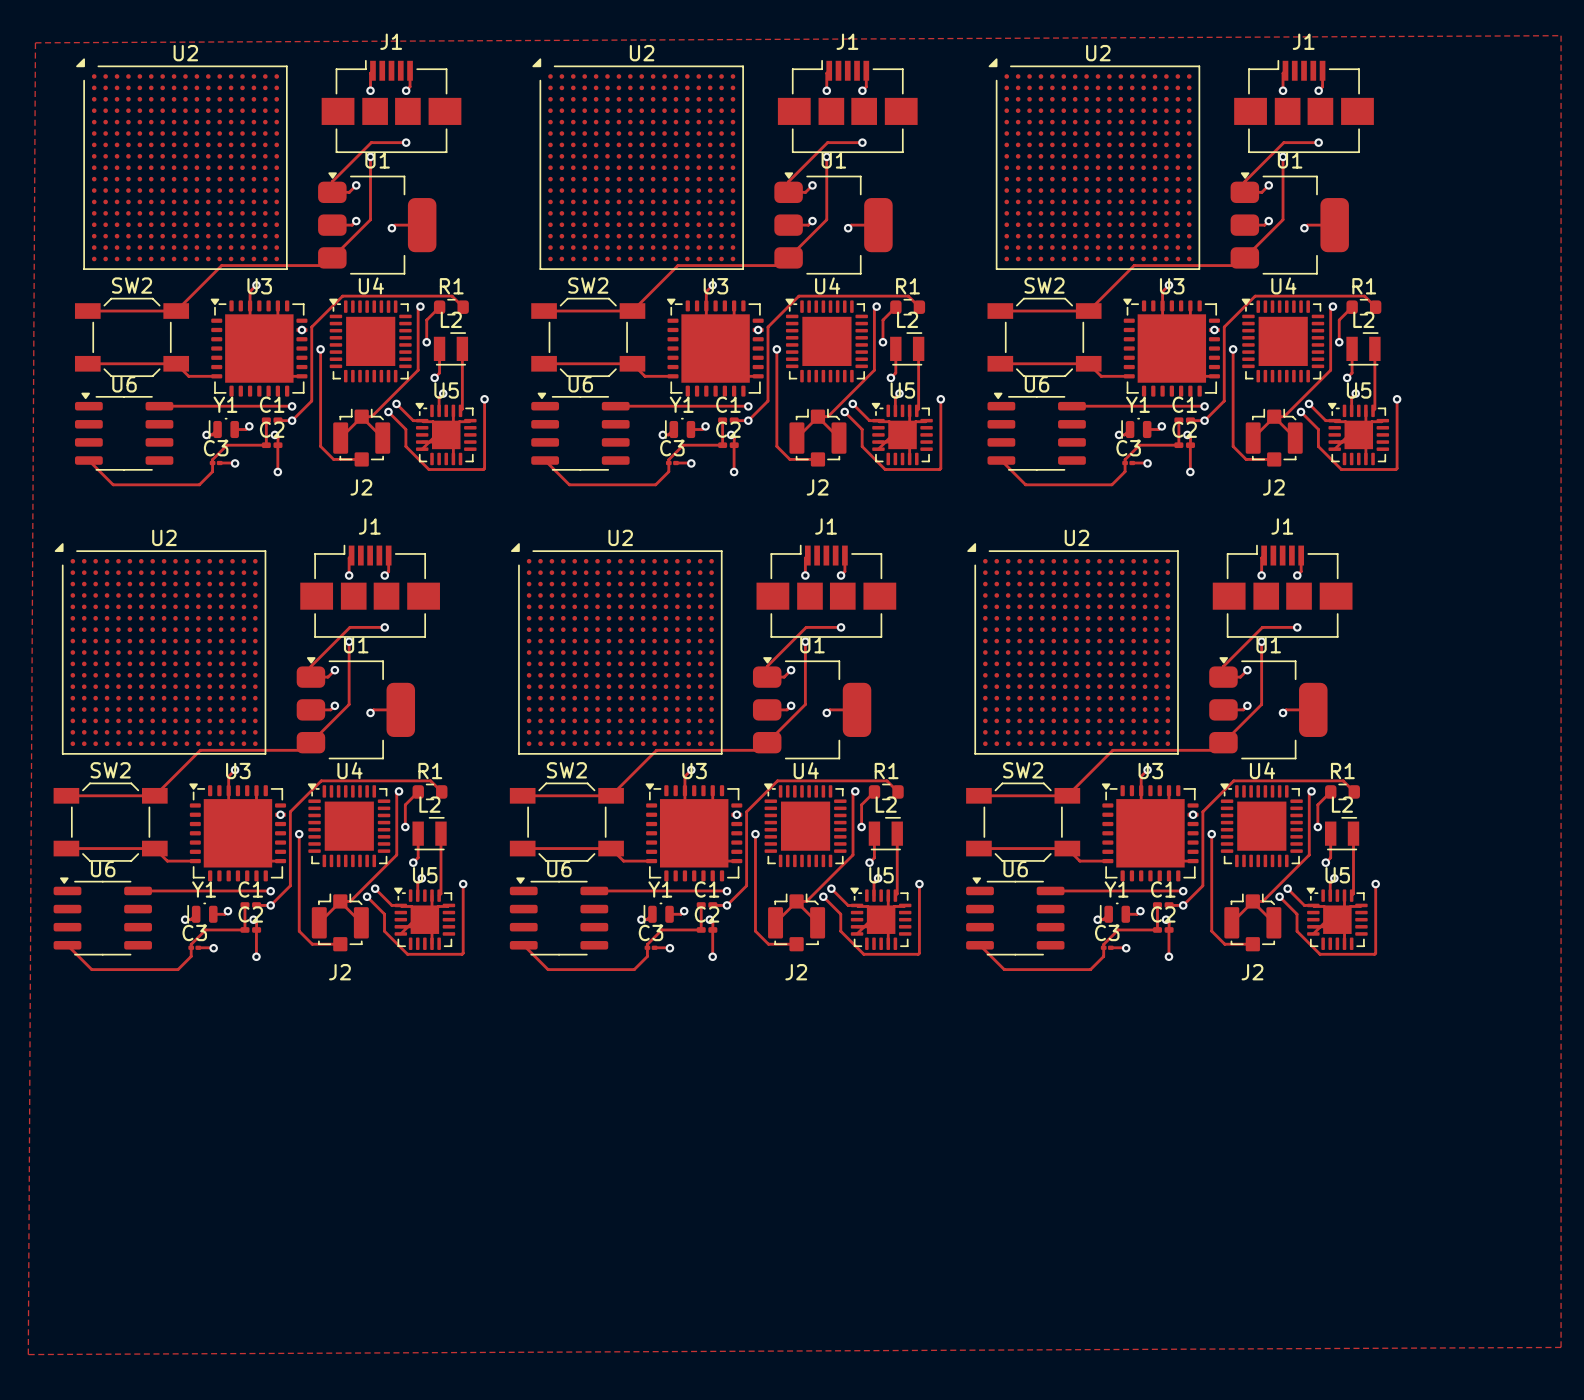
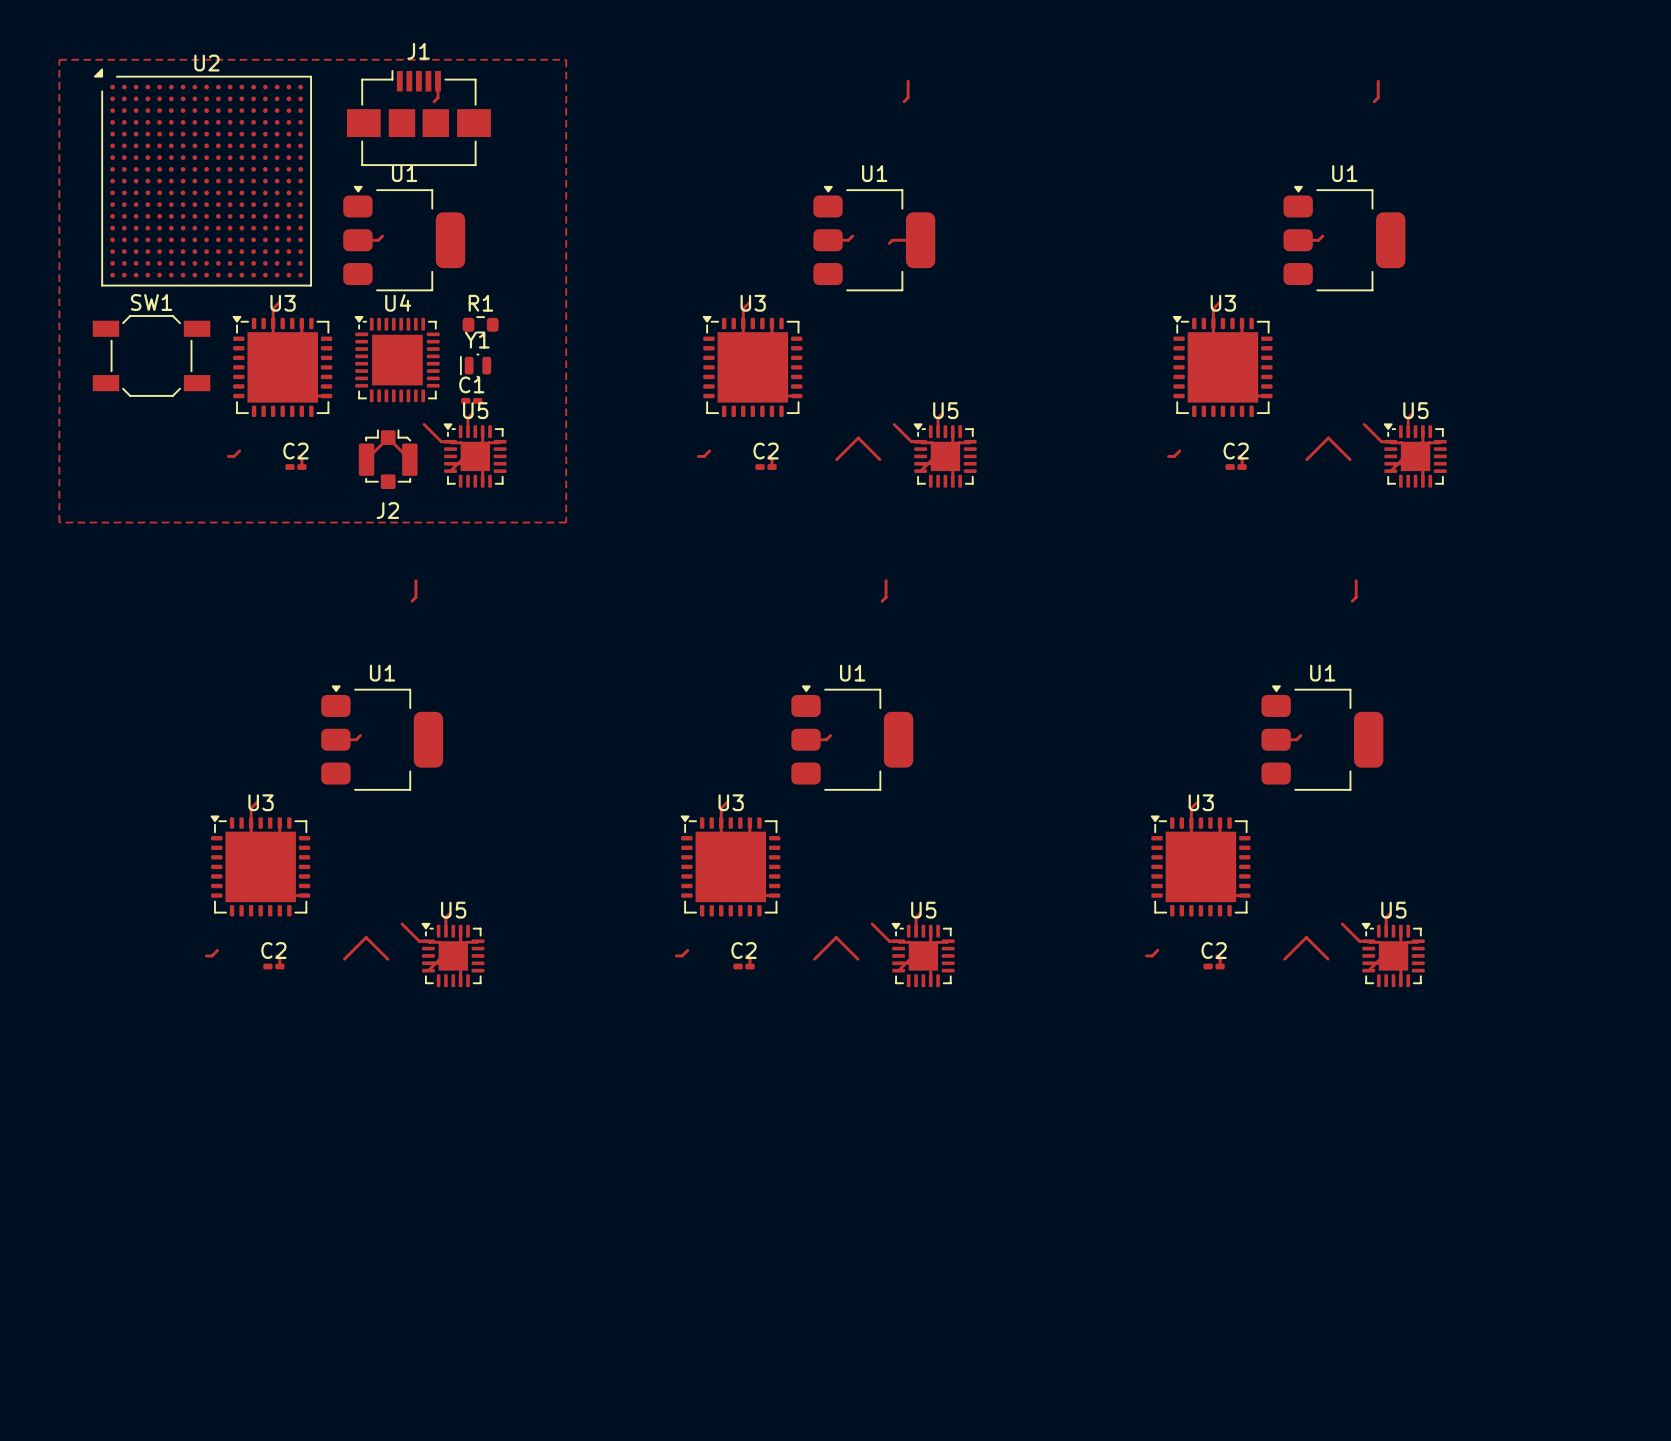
zone outline: (1561, 35) (35, 42) (28, 1354) (1561, 1347) (1561, 35) -> none
zone outline: none -> (59, 59) (566, 59) (566, 522) (59, 522) (59, 59)
track: (372, 70) (370, 73) (370, 90) -> none
track: (829, 70) (826, 73) (826, 90) -> none
track: (1285, 70) (1283, 73) (1283, 90) -> none
via: (370, 90) -> none
via: (406, 90) -> none
via: (826, 90) -> none
via: (862, 90) -> none
via: (1283, 90) -> none
via: (1318, 90) -> none
J1: (847, 106) -> none
J1: (1304, 106) -> none
track: (406, 142) (371, 142) (332, 181) (332, 192) (349, 192) (356, 185) -> none
via: (406, 142) -> none
track: (862, 142) (827, 142) (788, 181) (788, 192) (805, 192) (812, 185) -> none
via: (862, 142) -> none
track: (1318, 142) (1283, 142) (1244, 181) (1244, 192) (1261, 192) (1268, 185) -> none
via: (1318, 142) -> none
track: (370, 156) (370, 219) (324, 265) (221, 265) (176, 311) (87, 311) -> none
via: (370, 156) -> none
track: (826, 156) (826, 219) (780, 265) (677, 265) (632, 311) (544, 311) -> none
via: (826, 156) -> none
track: (1283, 156) (1283, 219) (1237, 265) (1134, 265) (1088, 311) (1000, 311) -> none
via: (1283, 156) -> none
U2: (638, 164) -> none
U2: (1094, 164) -> none
via: (356, 185) -> none
via: (812, 185) -> none
via: (1268, 185) -> none
via: (356, 221) -> none
via: (812, 221) -> none
via: (1268, 221) -> none
track: (422, 225) (394, 225) (391, 228) -> none
track: (1334, 225) (1307, 225) (1304, 228) -> none
via: (391, 228) -> none
via: (848, 228) -> none
via: (1304, 228) -> none
SW2 name: SW2 (132, 285) -> SW1 (151, 302)
via: (256, 285) -> none
via: (712, 285) -> none
via: (1168, 285) -> none
track: (420, 306) (418, 308) (418, 370) (371, 416) (361, 417) -> none
via: (420, 306) -> none
track: (876, 306) (874, 308) (874, 370) (827, 416) (817, 417) -> none
via: (876, 306) -> none
track: (1332, 306) (1330, 308) (1330, 370) (1284, 416) (1274, 417) -> none
via: (1332, 306) -> none
track: (439, 307) (426, 320) (426, 342) -> none
track: (463, 307) (452, 296) (342, 296) (311, 327) (311, 401) (292, 420) (277, 420) -> none
track: (895, 307) (882, 320) (882, 342) -> none
R1: (907, 307) -> none
track: (919, 307) (908, 296) (798, 296) (768, 327) (768, 401) (748, 420) (734, 420) -> none
track: (1352, 307) (1339, 320) (1339, 342) -> none
R1: (1363, 307) -> none
track: (1375, 307) (1364, 296) (1255, 296) (1224, 327) (1224, 401) (1204, 420) (1190, 420) -> none
via: (301, 329) -> none
via: (758, 329) -> none
via: (1214, 329) -> none
SW2: (588, 337) -> none
SW2: (1044, 337) -> none
U4: (826, 340) -> none
U4: (1282, 340) -> none
via: (426, 342) -> none
via: (882, 342) -> none
via: (1339, 342) -> none
Y1: none -> (475, 365)
track: (439, 348) (439, 373) (434, 377) -> none
L2: (450, 348) -> none
track: (462, 348) (462, 409) (460, 410) -> none
track: (895, 348) (895, 373) (890, 377) -> none
L2: (907, 348) -> none
track: (918, 348) (918, 409) (916, 410) -> none
track: (1352, 348) (1352, 373) (1347, 377) -> none
L2: (1363, 348) -> none
track: (1374, 348) (1374, 409) (1373, 410) -> none
track: (320, 349) (320, 446) (333, 459) (361, 459) -> none
via: (320, 349) -> none
track: (776, 349) (776, 446) (789, 459) (817, 459) -> none
via: (776, 349) -> none
track: (1233, 349) (1233, 446) (1246, 459) (1274, 459) -> none
via: (1233, 349) -> none
track: (87, 363) (176, 363) (188, 376) (216, 376) -> none
track: (544, 363) (632, 363) (645, 376) (672, 376) -> none
track: (1000, 363) (1088, 363) (1101, 376) (1129, 376) -> none
via: (434, 377) -> none
via: (890, 377) -> none
via: (1347, 377) -> none
C1: none -> (471, 400)
via: (443, 393) -> none
via: (899, 393) -> none
via: (1355, 393) -> none
track: (484, 399) (483, 469) (428, 469) (405, 446) (405, 429) (388, 411) -> none
via: (484, 399) -> none
track: (940, 399) (939, 469) (885, 469) (862, 446) (862, 429) (844, 411) -> none
via: (940, 399) -> none
track: (1397, 399) (1396, 469) (1341, 469) (1318, 446) (1318, 429) (1300, 411) -> none
via: (1397, 399) -> none
via: (396, 403) -> none
via: (852, 403) -> none
via: (1309, 403) -> none
track: (159, 406) (292, 406) -> none
via: (292, 406) -> none
track: (615, 406) (748, 406) -> none
via: (748, 406) -> none
track: (1071, 406) (1204, 406) -> none
via: (1204, 406) -> none
via: (388, 411) -> none
via: (844, 411) -> none
via: (1300, 411) -> none
track: (266, 420) (266, 445) (227, 445) (212, 459) (212, 471) (199, 484) (113, 484) (88, 460) -> none
C1: (272, 420) -> none
via: (292, 420) -> none
track: (722, 420) (722, 445) (683, 445) (668, 459) (668, 471) (655, 484) (569, 484) (545, 460) -> none
C1: (728, 420) -> none
via: (748, 420) -> none
track: (1178, 420) (1178, 445) (1139, 445) (1125, 459) (1125, 471) (1111, 484) (1025, 484) (1001, 460) -> none
C1: (1184, 420) -> none
via: (1204, 420) -> none
track: (249, 426) (246, 429) (234, 429) -> none
via: (249, 426) -> none
track: (705, 426) (702, 429) (690, 429) -> none
via: (705, 426) -> none
track: (1161, 426) (1158, 429) (1147, 429) -> none
via: (1161, 426) -> none
Y1: (223, 429) -> none
Y1: (680, 429) -> none
Y1: (1136, 429) -> none
U6: (124, 431) -> none
U6: (580, 431) -> none
U6: (1036, 431) -> none
via: (206, 434) -> none
via: (274, 434) -> none
via: (662, 434) -> none
via: (731, 434) -> none
via: (1119, 434) -> none
via: (1187, 434) -> none
J2: (817, 437) -> none
J2: (1274, 437) -> none
track: (277, 445) (277, 471) -> none
track: (734, 445) (734, 471) -> none
track: (1190, 445) (1190, 471) -> none
C3: (216, 463) -> none
track: (219, 463) (235, 463) -> none
via: (235, 463) -> none
C3: (672, 463) -> none
track: (675, 463) (691, 463) -> none
via: (691, 463) -> none
C3: (1128, 463) -> none
track: (1132, 463) (1147, 463) -> none
via: (1147, 463) -> none
via: (277, 471) -> none
via: (734, 471) -> none
via: (1190, 471) -> none
track: (351, 555) (349, 558) (349, 575) -> none
track: (807, 555) (805, 558) (805, 575) -> none
track: (1264, 555) (1261, 558) (1261, 575) -> none
via: (349, 575) -> none
via: (384, 575) -> none
via: (805, 575) -> none
via: (841, 575) -> none
via: (1261, 575) -> none
via: (1297, 575) -> none
J1: (370, 591) -> none
J1: (826, 591) -> none
J1: (1282, 591) -> none
track: (384, 627) (349, 627) (310, 666) (310, 677) (327, 677) (334, 670) -> none
via: (384, 627) -> none
track: (841, 627) (806, 627) (767, 666) (767, 677) (784, 677) (791, 670) -> none
via: (841, 627) -> none
track: (1297, 627) (1262, 627) (1223, 666) (1223, 677) (1240, 677) (1247, 670) -> none
via: (1297, 627) -> none
track: (349, 641) (349, 704) (303, 750) (200, 750) (154, 795) (66, 795) -> none
via: (349, 641) -> none
track: (805, 641) (805, 704) (759, 750) (656, 750) (611, 795) (522, 795) -> none
via: (805, 641) -> none
track: (1261, 641) (1261, 704) (1215, 750) (1112, 750) (1067, 795) (978, 795) -> none
via: (1261, 641) -> none
U2: (160, 648) -> none
U2: (616, 648) -> none
U2: (1073, 648) -> none
via: (334, 670) -> none
via: (791, 670) -> none
via: (1247, 670) -> none
via: (334, 705) -> none
via: (791, 705) -> none
via: (1247, 705) -> none
track: (400, 709) (373, 709) (370, 712) -> none
track: (857, 709) (829, 709) (826, 712) -> none
track: (1313, 709) (1286, 709) (1283, 712) -> none
via: (370, 712) -> none
via: (826, 712) -> none
via: (1283, 712) -> none
via: (235, 769) -> none
via: (691, 769) -> none
via: (1147, 769) -> none
track: (399, 791) (396, 793) (396, 854) (350, 901) (340, 901) -> none
via: (399, 791) -> none
track: (418, 791) (405, 804) (405, 827) -> none
R1: (430, 791) -> none
track: (441, 791) (430, 780) (321, 780) (290, 811) (290, 885) (270, 905) (256, 905) -> none
track: (855, 791) (853, 793) (853, 854) (806, 901) (796, 901) -> none
via: (855, 791) -> none
track: (874, 791) (861, 804) (861, 827) -> none
R1: (886, 791) -> none
track: (898, 791) (886, 780) (777, 780) (746, 811) (746, 885) (726, 905) (712, 905) -> none
track: (1311, 791) (1309, 793) (1309, 854) (1262, 901) (1252, 901) -> none
via: (1311, 791) -> none
track: (1330, 791) (1317, 804) (1317, 827) -> none
R1: (1342, 791) -> none
track: (1354, 791) (1343, 780) (1233, 780) (1202, 811) (1202, 885) (1183, 905) (1169, 905) -> none
via: (280, 814) -> none
via: (736, 814) -> none
via: (1193, 814) -> none
SW2: (110, 822) -> none
SW2: (566, 822) -> none
SW2: (1023, 822) -> none
U4: (349, 825) -> none
U4: (805, 825) -> none
U4: (1261, 825) -> none
via: (405, 827) -> none
via: (861, 827) -> none
via: (1317, 827) -> none
track: (418, 833) (418, 857) (413, 862) -> none
L2: (429, 833) -> none
track: (440, 833) (440, 893) (439, 895) -> none
track: (874, 833) (874, 857) (869, 862) -> none
L2: (885, 833) -> none
track: (897, 833) (897, 893) (895, 895) -> none
track: (1330, 833) (1330, 857) (1325, 862) -> none
L2: (1342, 833) -> none
track: (1353, 833) (1353, 893) (1351, 895) -> none
track: (299, 834) (299, 931) (312, 944) (340, 944) -> none
via: (299, 834) -> none
track: (755, 834) (755, 931) (768, 944) (796, 944) -> none
via: (755, 834) -> none
track: (1211, 834) (1211, 931) (1224, 944) (1252, 944) -> none
via: (1211, 834) -> none
track: (66, 848) (154, 848) (167, 861) (195, 861) -> none
track: (522, 848) (611, 848) (623, 861) (651, 861) -> none
track: (978, 848) (1067, 848) (1079, 861) (1107, 861) -> none
via: (413, 862) -> none
via: (869, 862) -> none
via: (1325, 862) -> none
via: (421, 878) -> none
via: (878, 878) -> none
via: (1334, 878) -> none
track: (463, 884) (462, 954) (407, 954) (384, 931) (384, 914) (367, 896) -> none
via: (463, 884) -> none
track: (919, 884) (918, 954) (863, 954) (840, 931) (840, 914) (823, 896) -> none
via: (919, 884) -> none
track: (1375, 884) (1374, 954) (1320, 954) (1297, 931) (1297, 914) (1279, 896) -> none
via: (1375, 884) -> none
via: (375, 888) -> none
via: (831, 888) -> none
via: (1287, 888) -> none
track: (138, 890) (270, 891) -> none
track: (594, 890) (726, 891) -> none
track: (1050, 890) (1183, 891) -> none
via: (270, 891) -> none
via: (726, 891) -> none
via: (1183, 891) -> none
via: (367, 896) -> none
via: (823, 896) -> none
via: (1279, 896) -> none
track: (244, 905) (244, 929) (205, 929) (191, 944) (191, 956) (178, 969) (91, 969) (67, 945) -> none
C1: (250, 905) -> none
via: (270, 905) -> none
track: (701, 905) (701, 929) (661, 929) (647, 944) (647, 956) (634, 969) (548, 969) (523, 945) -> none
C1: (707, 905) -> none
via: (726, 905) -> none
track: (1157, 905) (1157, 929) (1118, 929) (1103, 944) (1103, 956) (1090, 969) (1004, 969) (980, 945) -> none
C1: (1163, 905) -> none
via: (1183, 905) -> none
track: (227, 911) (224, 914) (213, 914) -> none
via: (227, 911) -> none
track: (684, 911) (681, 914) (669, 914) -> none
via: (684, 911) -> none
track: (1140, 911) (1137, 914) (1125, 914) -> none
via: (1140, 911) -> none
Y1: (202, 914) -> none
Y1: (658, 914) -> none
Y1: (1114, 914) -> none
U6: (102, 916) -> none
U6: (559, 916) -> none
U6: (1015, 916) -> none
via: (185, 919) -> none
via: (253, 919) -> none
via: (641, 919) -> none
via: (709, 919) -> none
via: (1097, 919) -> none
via: (1166, 919) -> none
J2: (340, 922) -> none
J2: (796, 922) -> none
J2: (1252, 922) -> none
track: (256, 930) (256, 956) -> none
track: (712, 930) (712, 956) -> none
track: (1168, 930) (1168, 956) -> none
C3: (194, 947) -> none
track: (198, 947) (213, 948) -> none
C3: (651, 947) -> none
track: (654, 947) (669, 948) -> none
C3: (1107, 947) -> none
track: (1110, 947) (1126, 948) -> none
via: (213, 948) -> none
via: (669, 948) -> none
via: (1126, 948) -> none
via: (256, 956) -> none
via: (712, 956) -> none
via: (1168, 956) -> none

